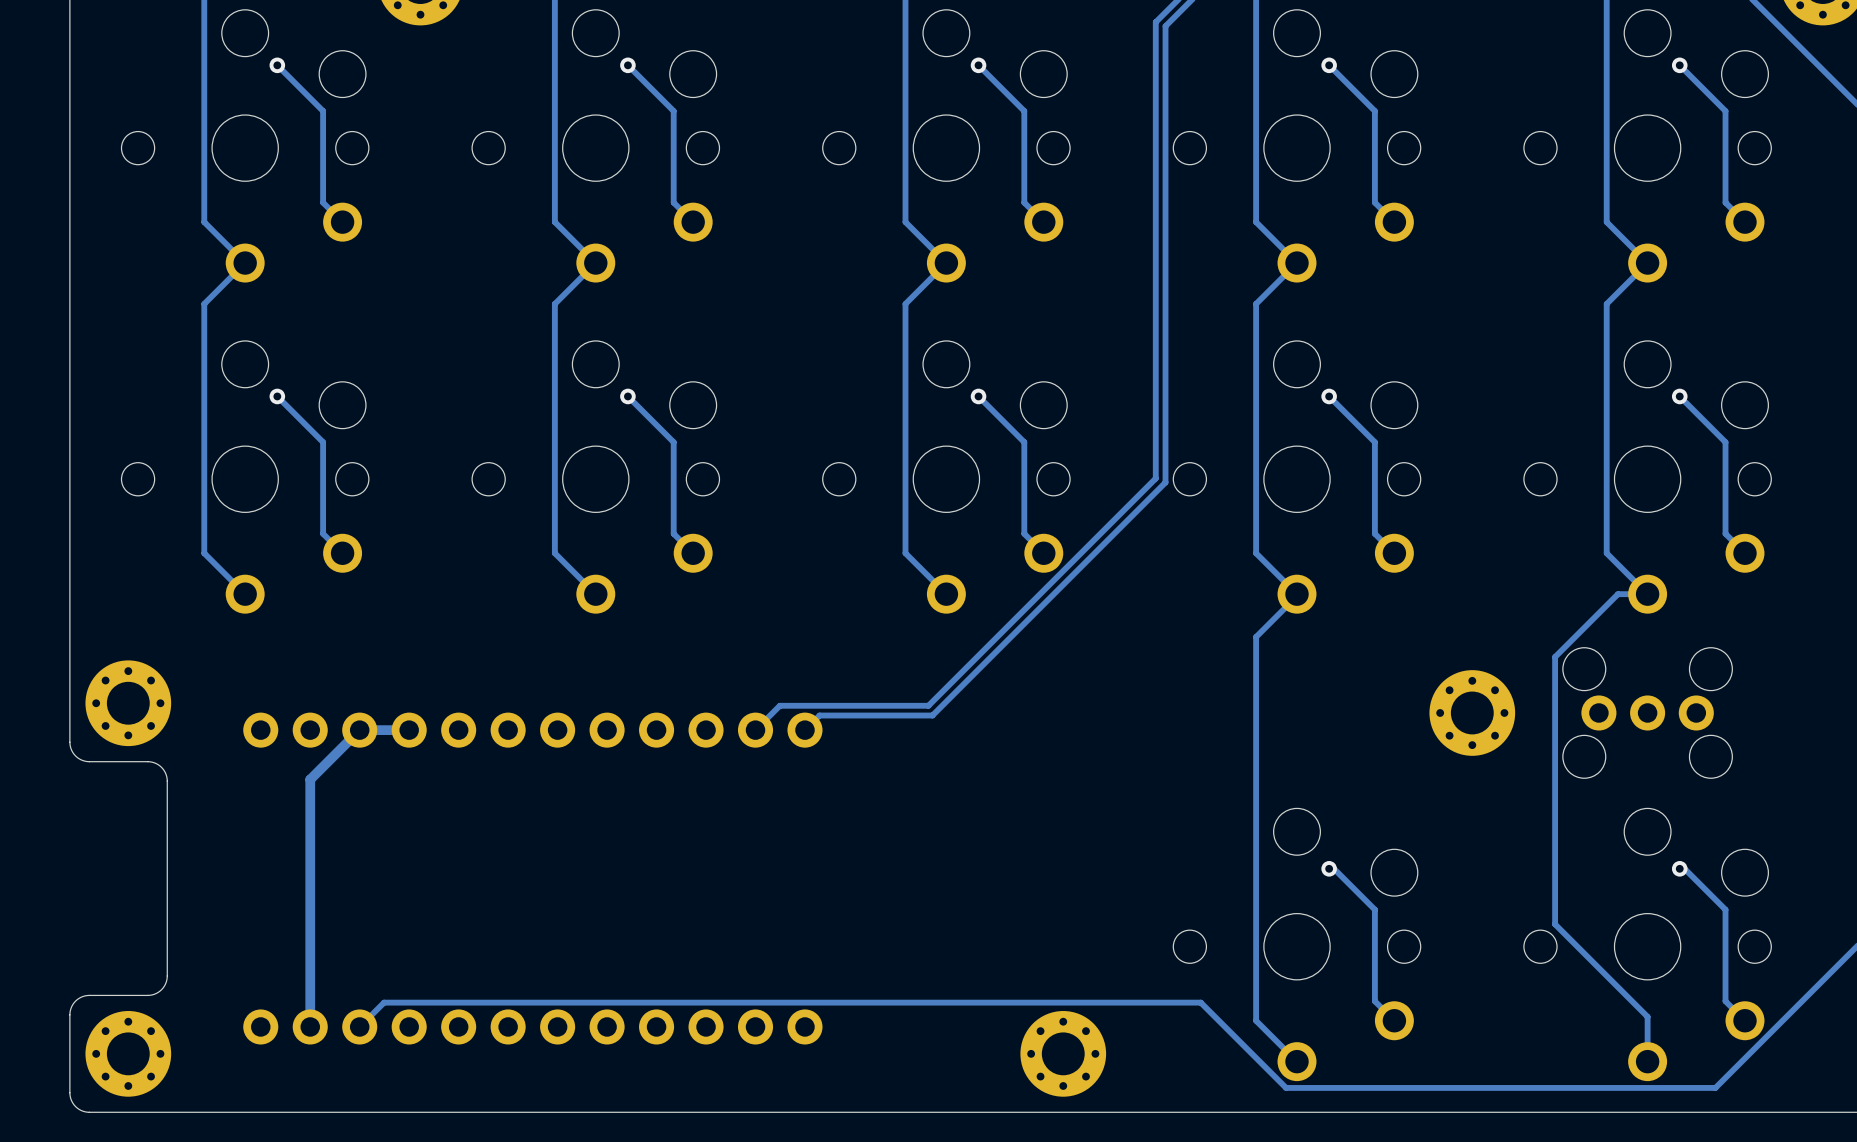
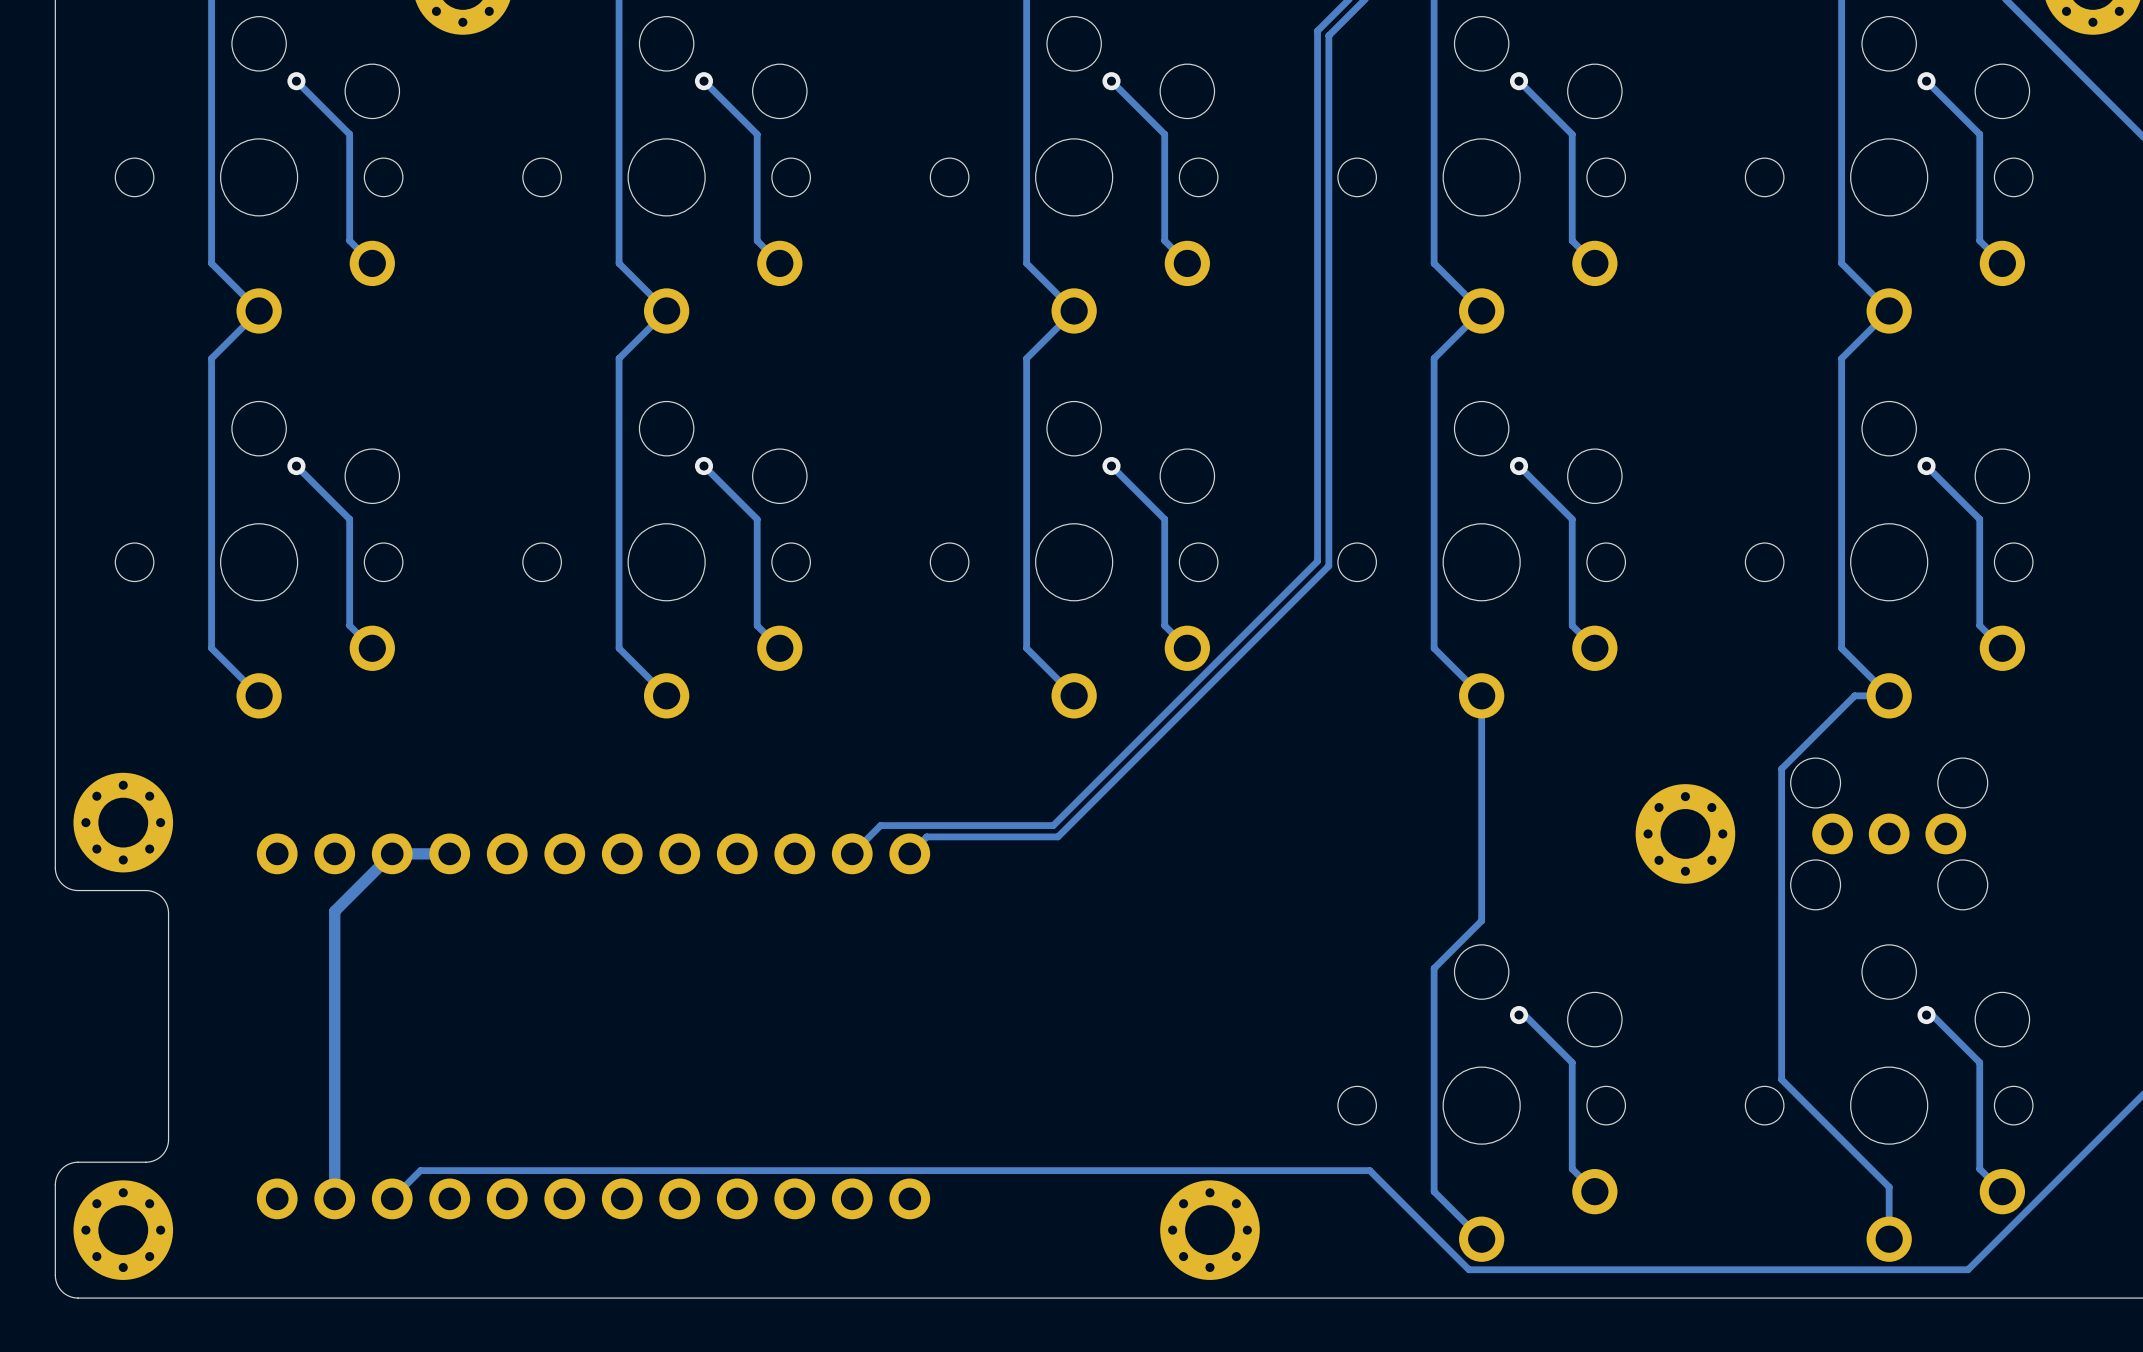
track: (1297, 596) (1256, 637) (1256, 828) -> (1481, 698) (1481, 920) (1434, 968)

